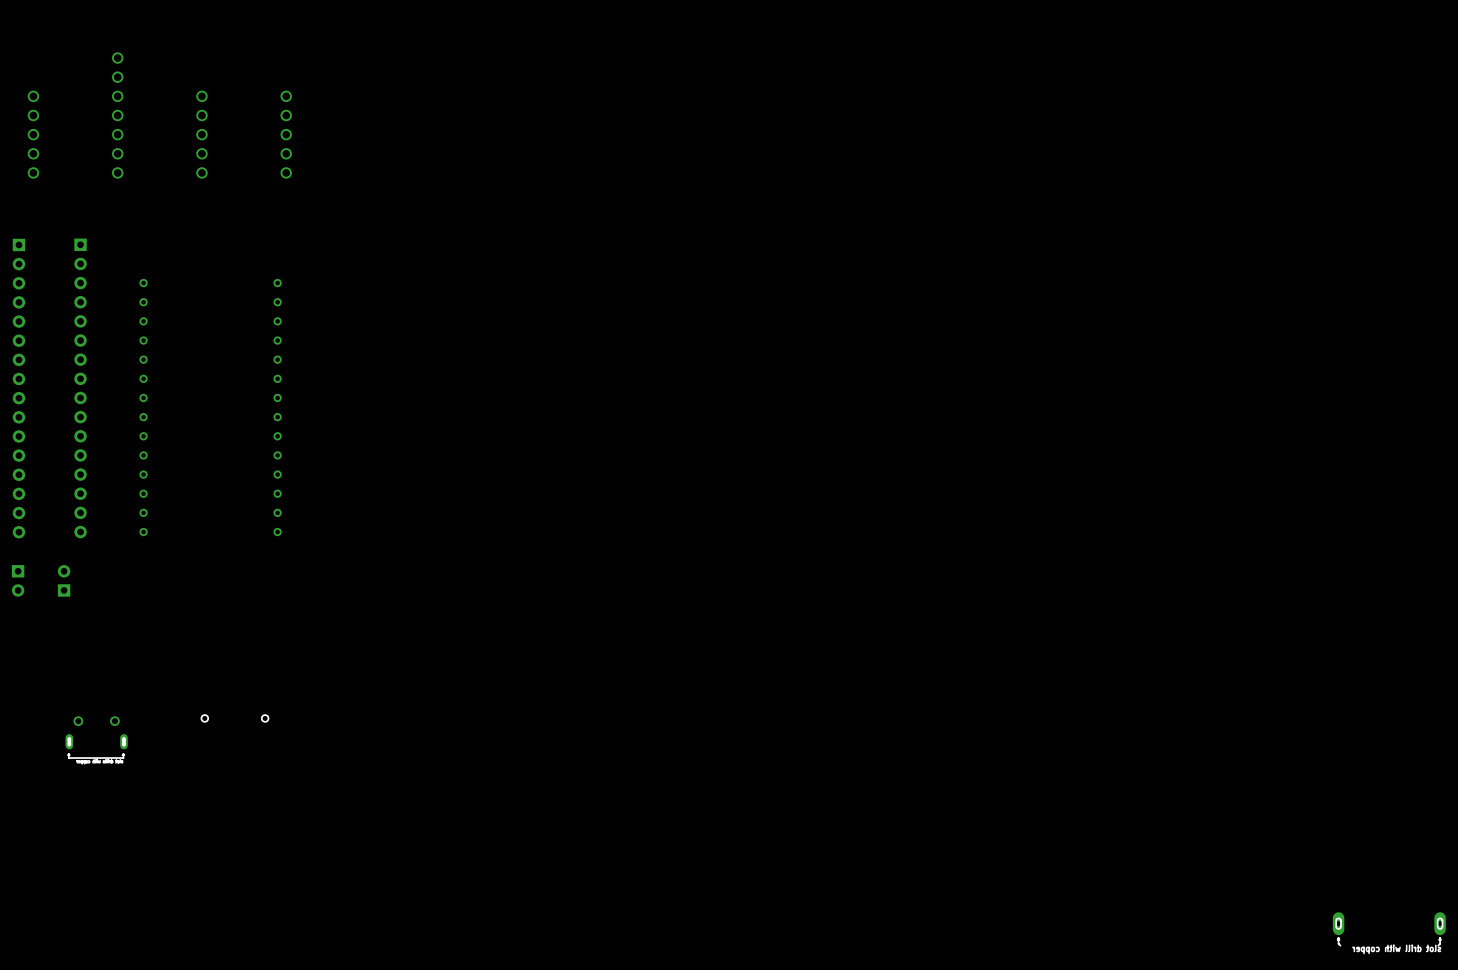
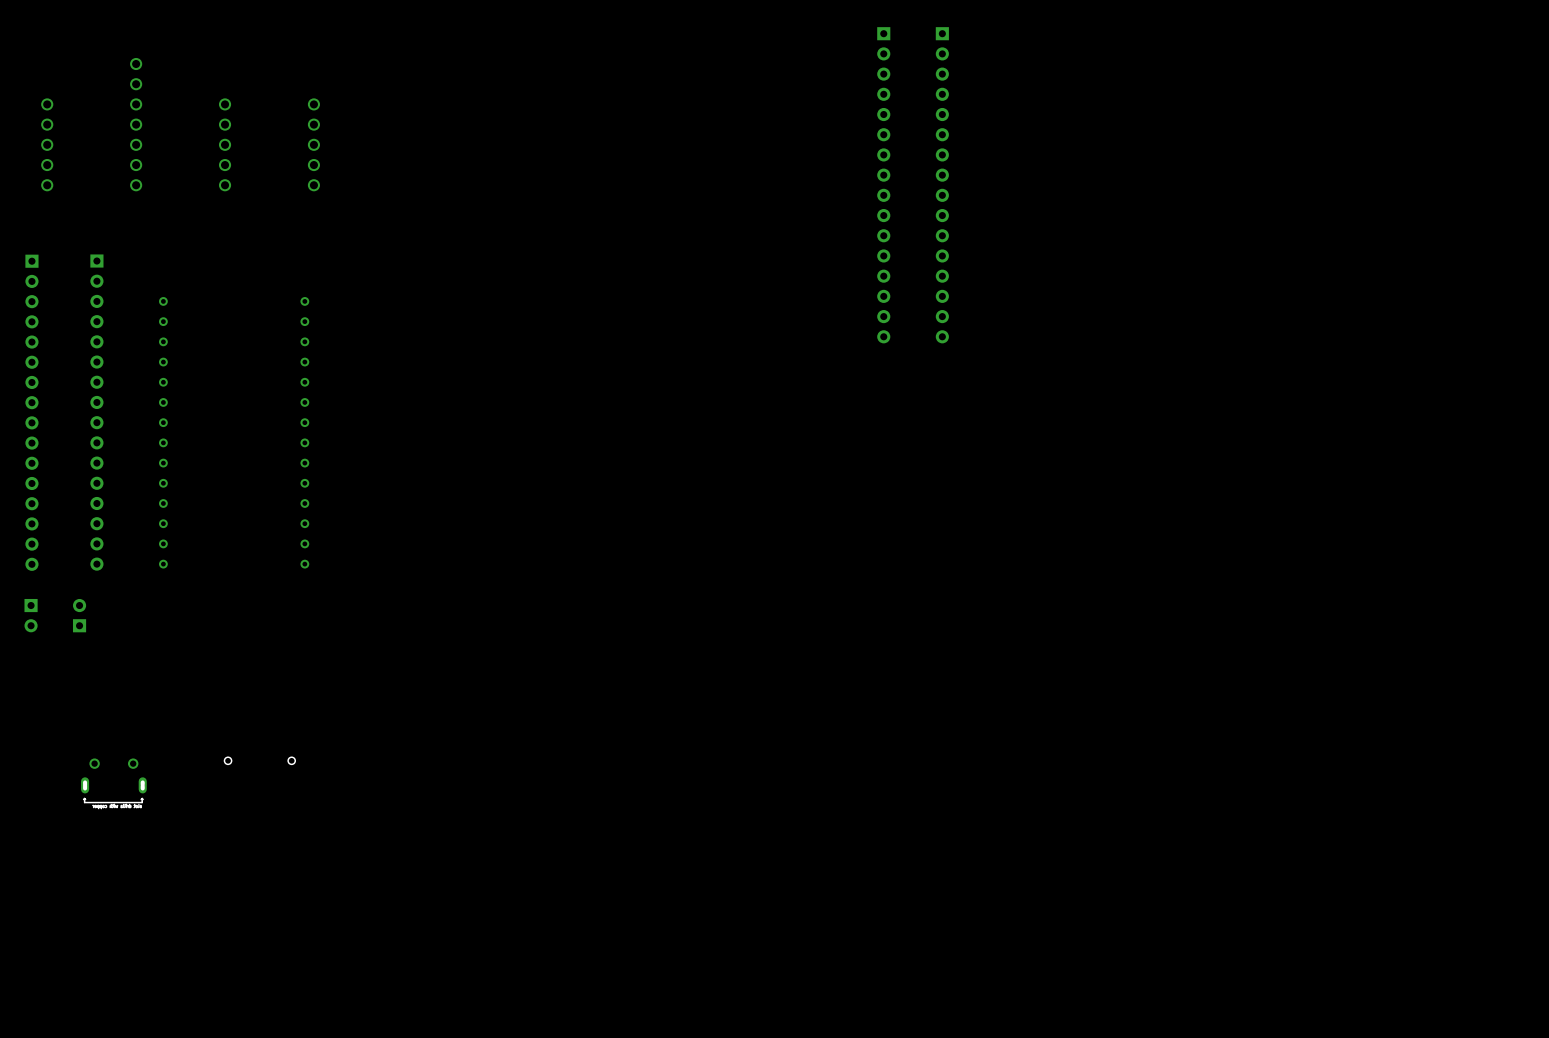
part: none -> (883, 185)
part: none -> (942, 185)
part: (1389, 928) -> none

